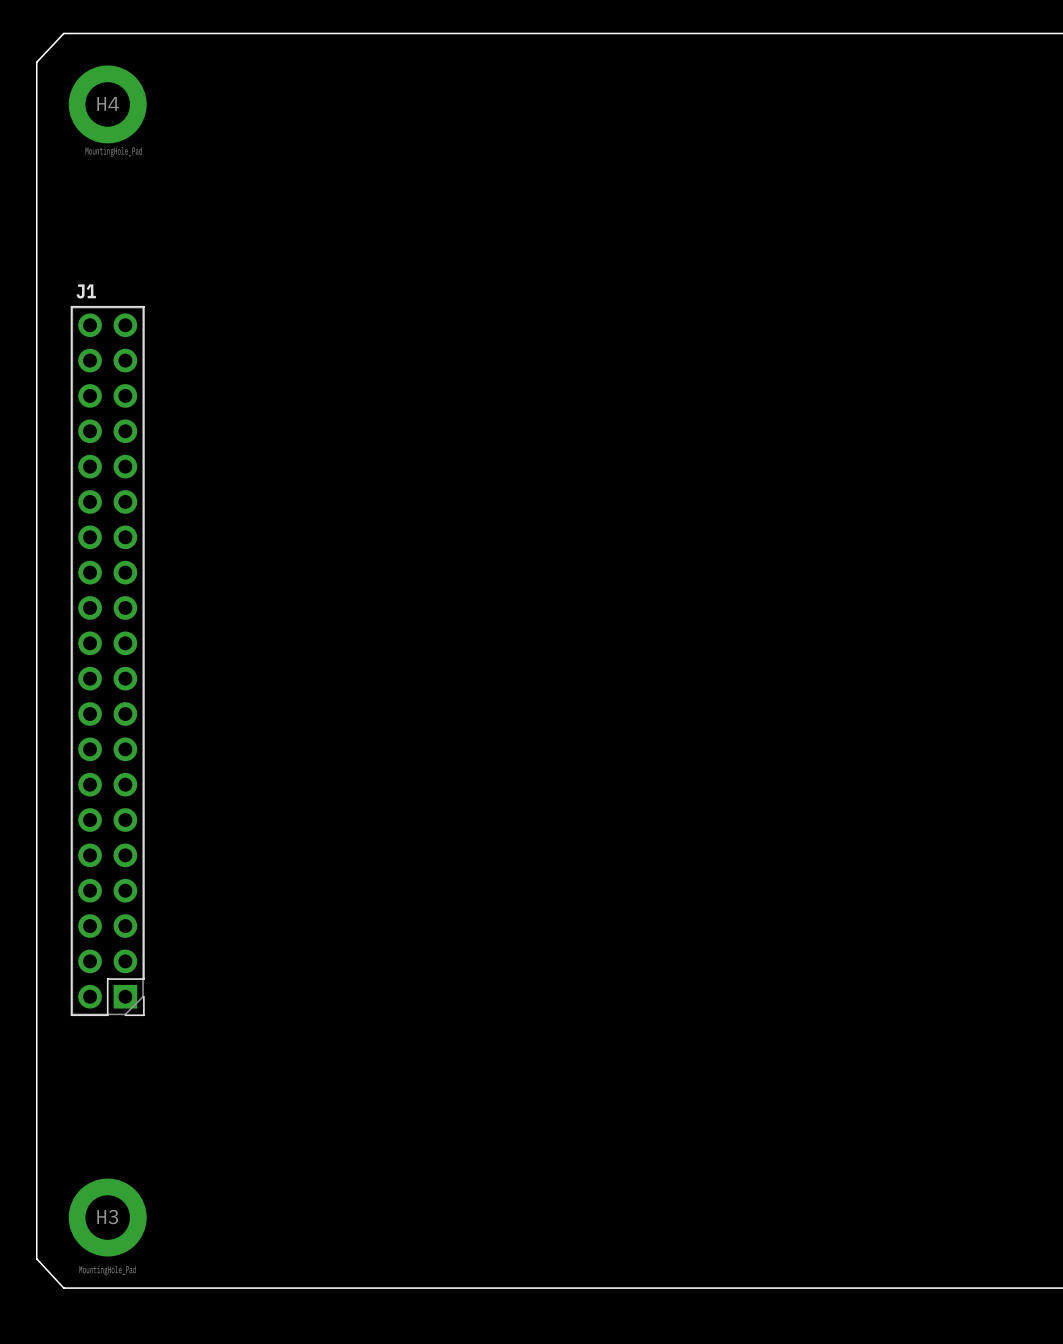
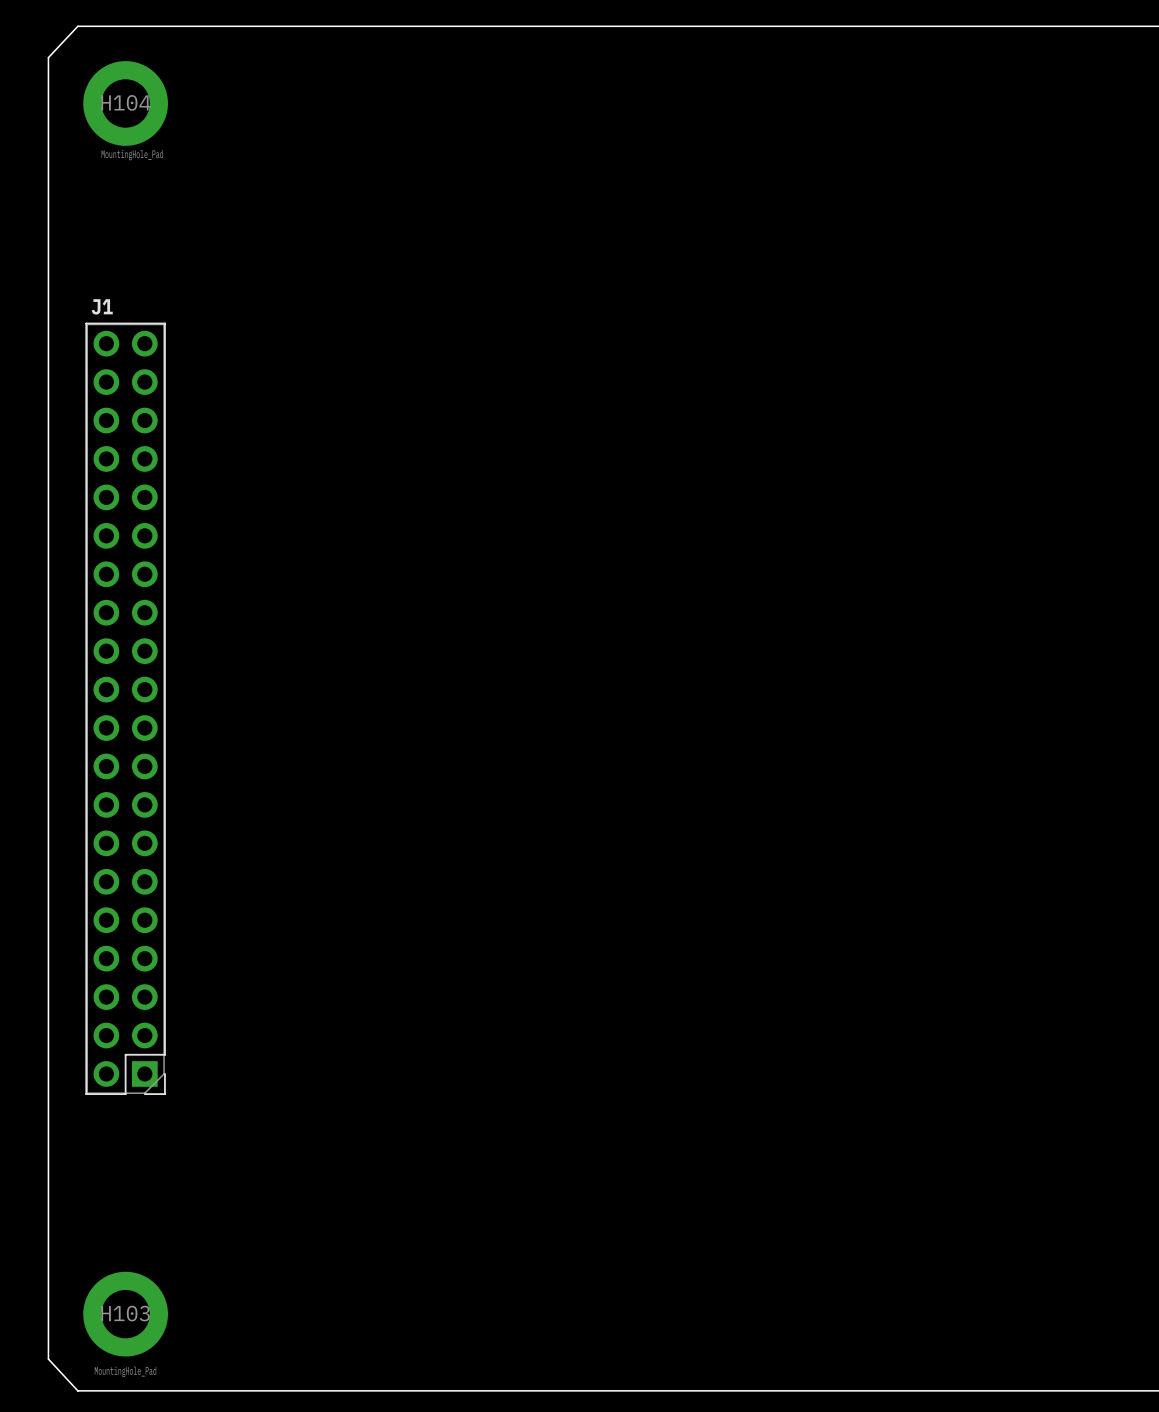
H4 name: H4 (108, 103) -> H104 (126, 102)
H3 name: H3 (107, 1217) -> H103 (125, 1313)

